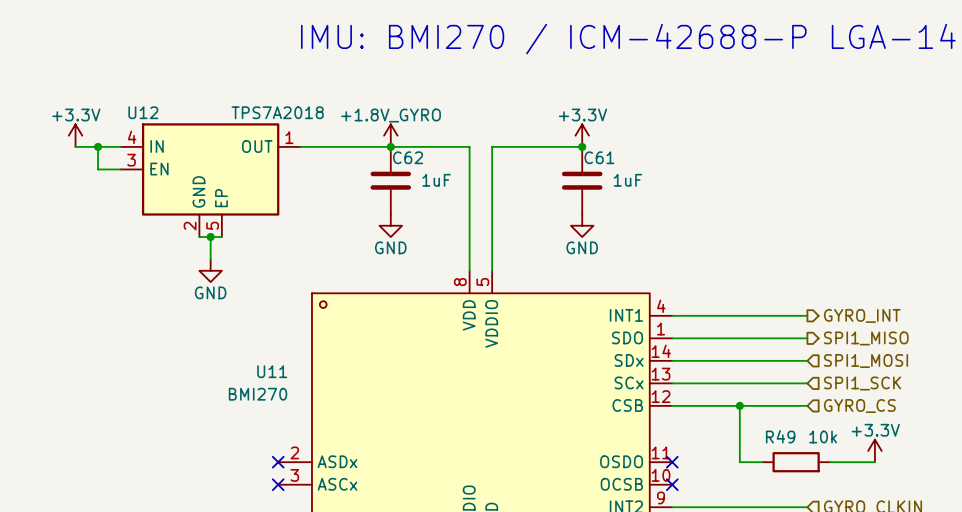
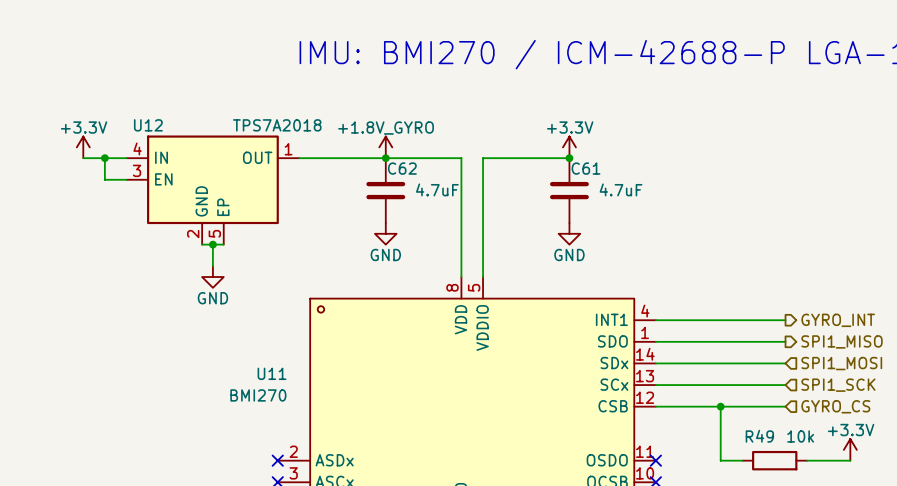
C62 value: 1uF (436, 180) -> 4.7uF (437, 189)
C61 value: 1uF (627, 180) -> 4.7uF (621, 189)

